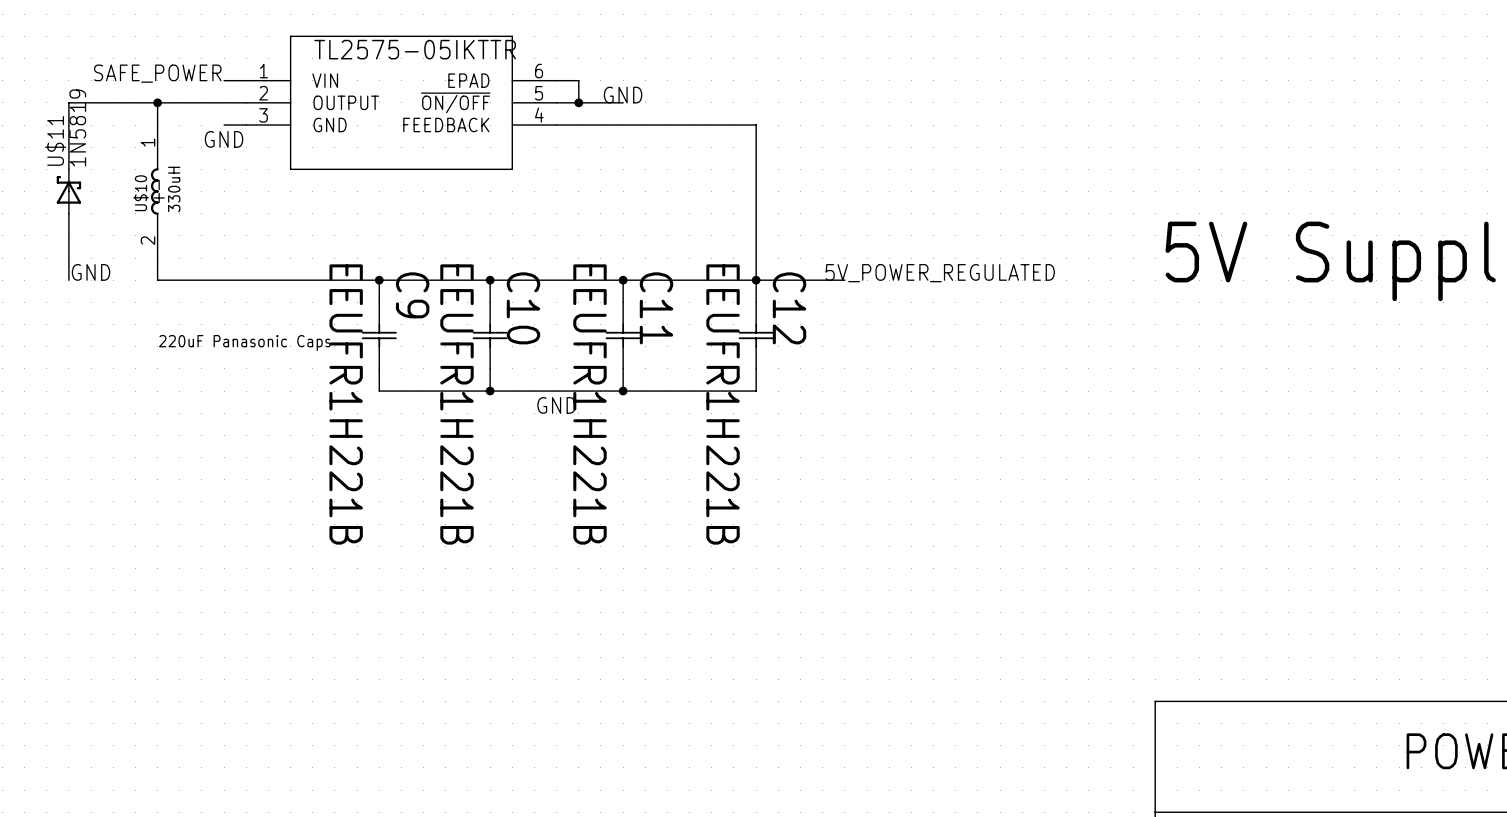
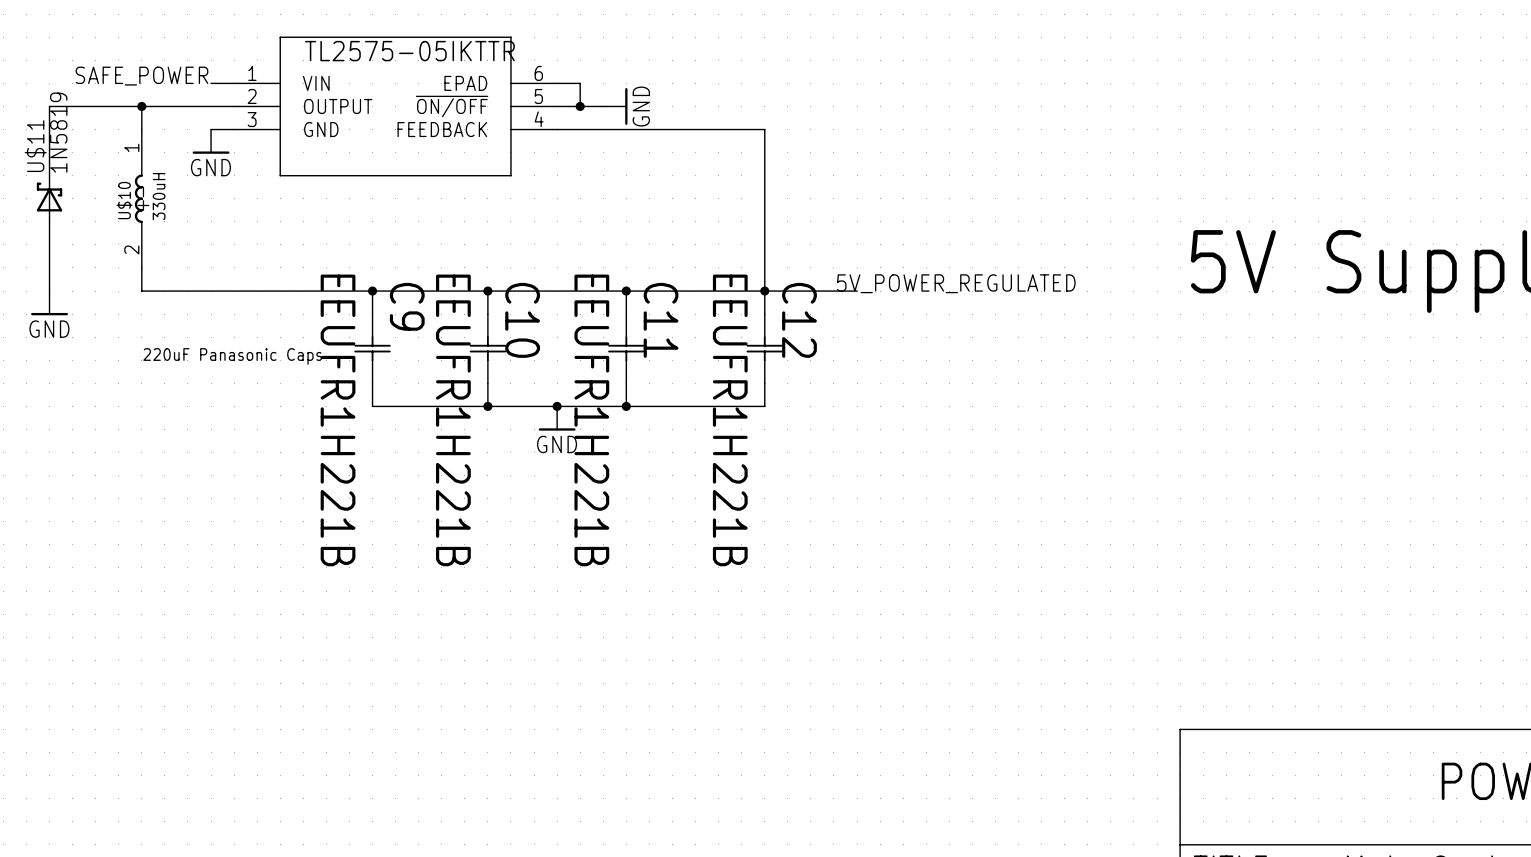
label: GND (623, 95) -> none
power symbol: none -> GND (615, 106)
power symbol: none -> GND (211, 141)
label: GND (224, 139) -> none
label: GND (91, 272) -> none
power symbol: none -> GND (49, 303)
junction: none -> (557, 406)
power symbol: none -> GND (557, 418)
label: GND (556, 405) -> none

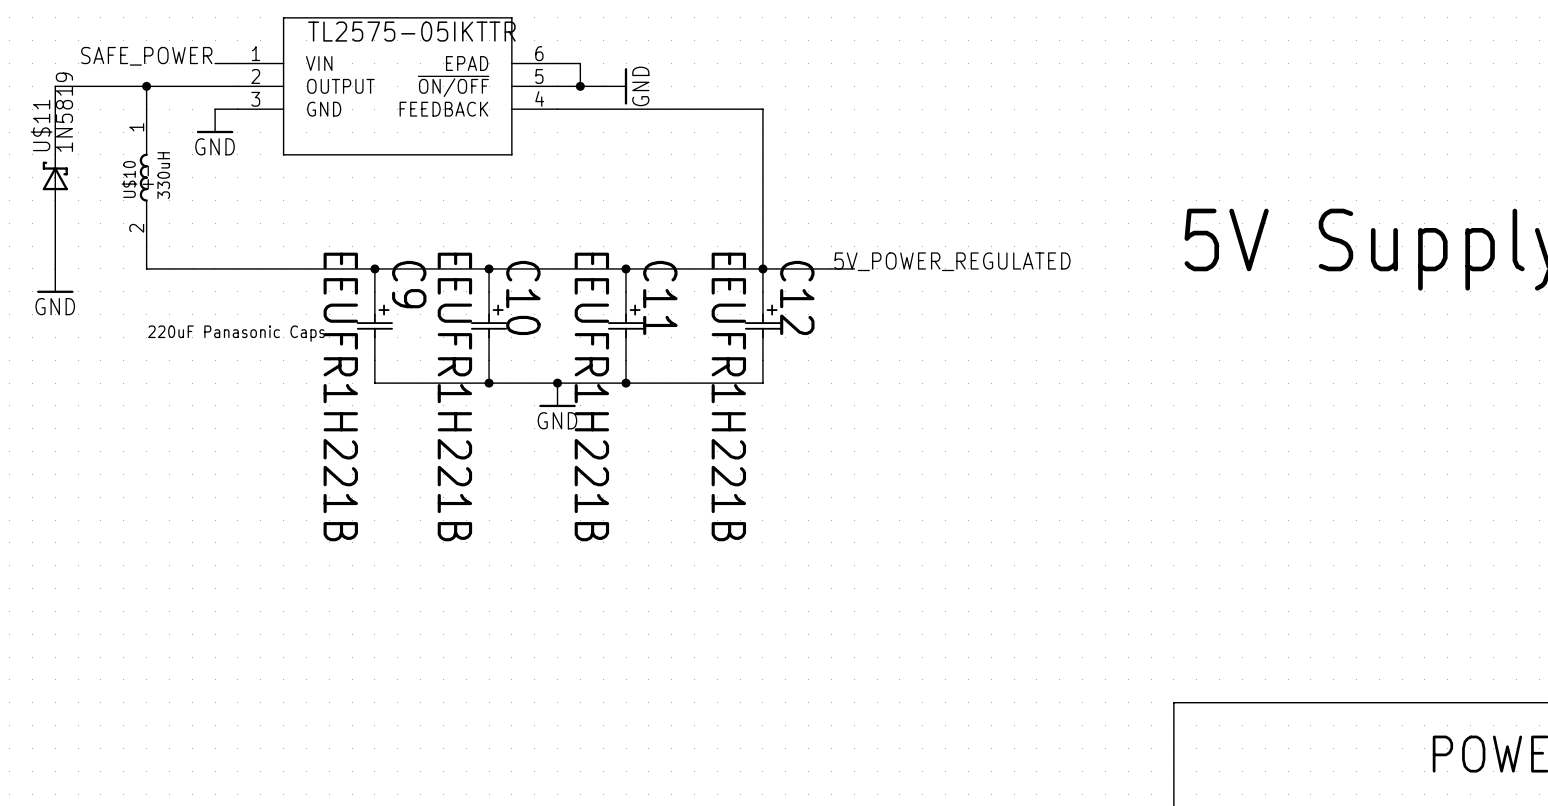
C9 symbol: [354, 314, 391, 384] -> [356, 291, 393, 361]
C10 symbol: [469, 314, 507, 384] -> [471, 291, 508, 361]
C11 symbol: [608, 314, 645, 384] -> [607, 291, 645, 361]
C12 symbol: [746, 314, 784, 384] -> [744, 291, 782, 361]

